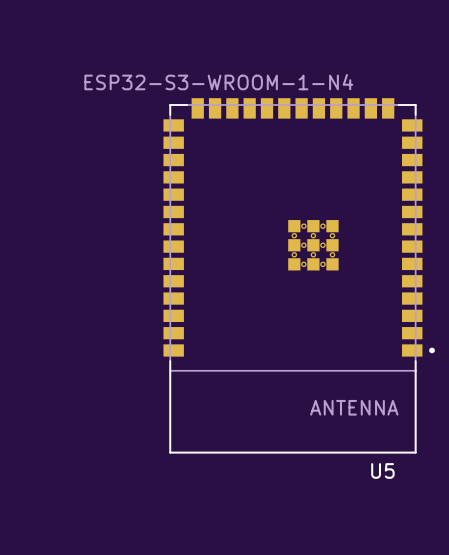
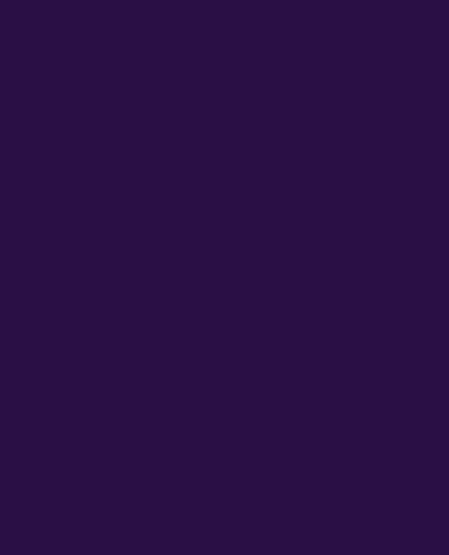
U5: ESP32-S3-WROOM-1-N4 (299, 275) -> none

